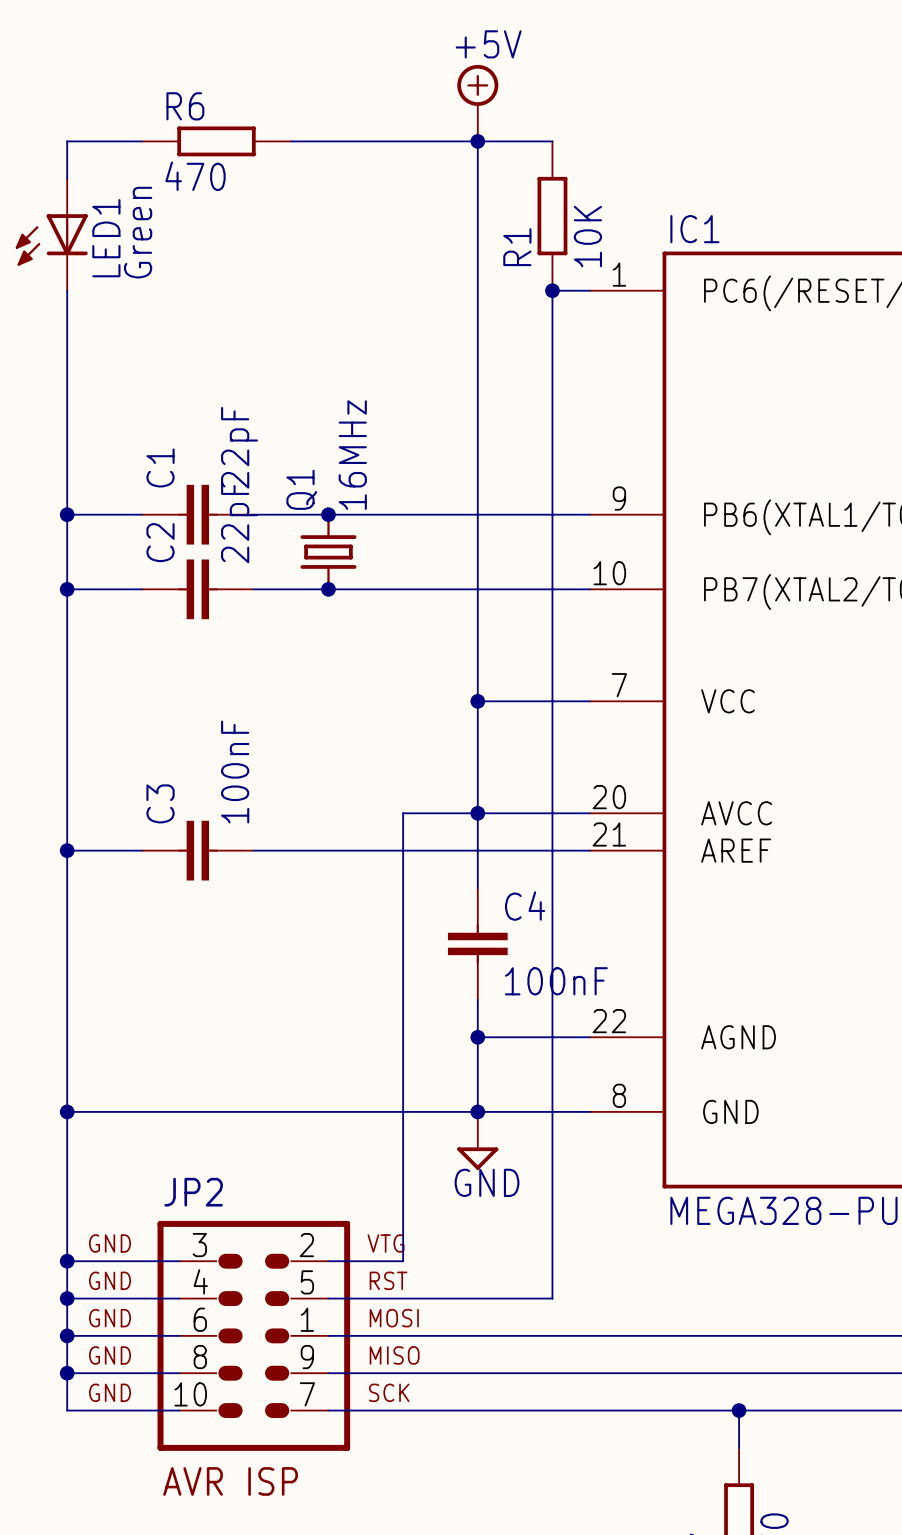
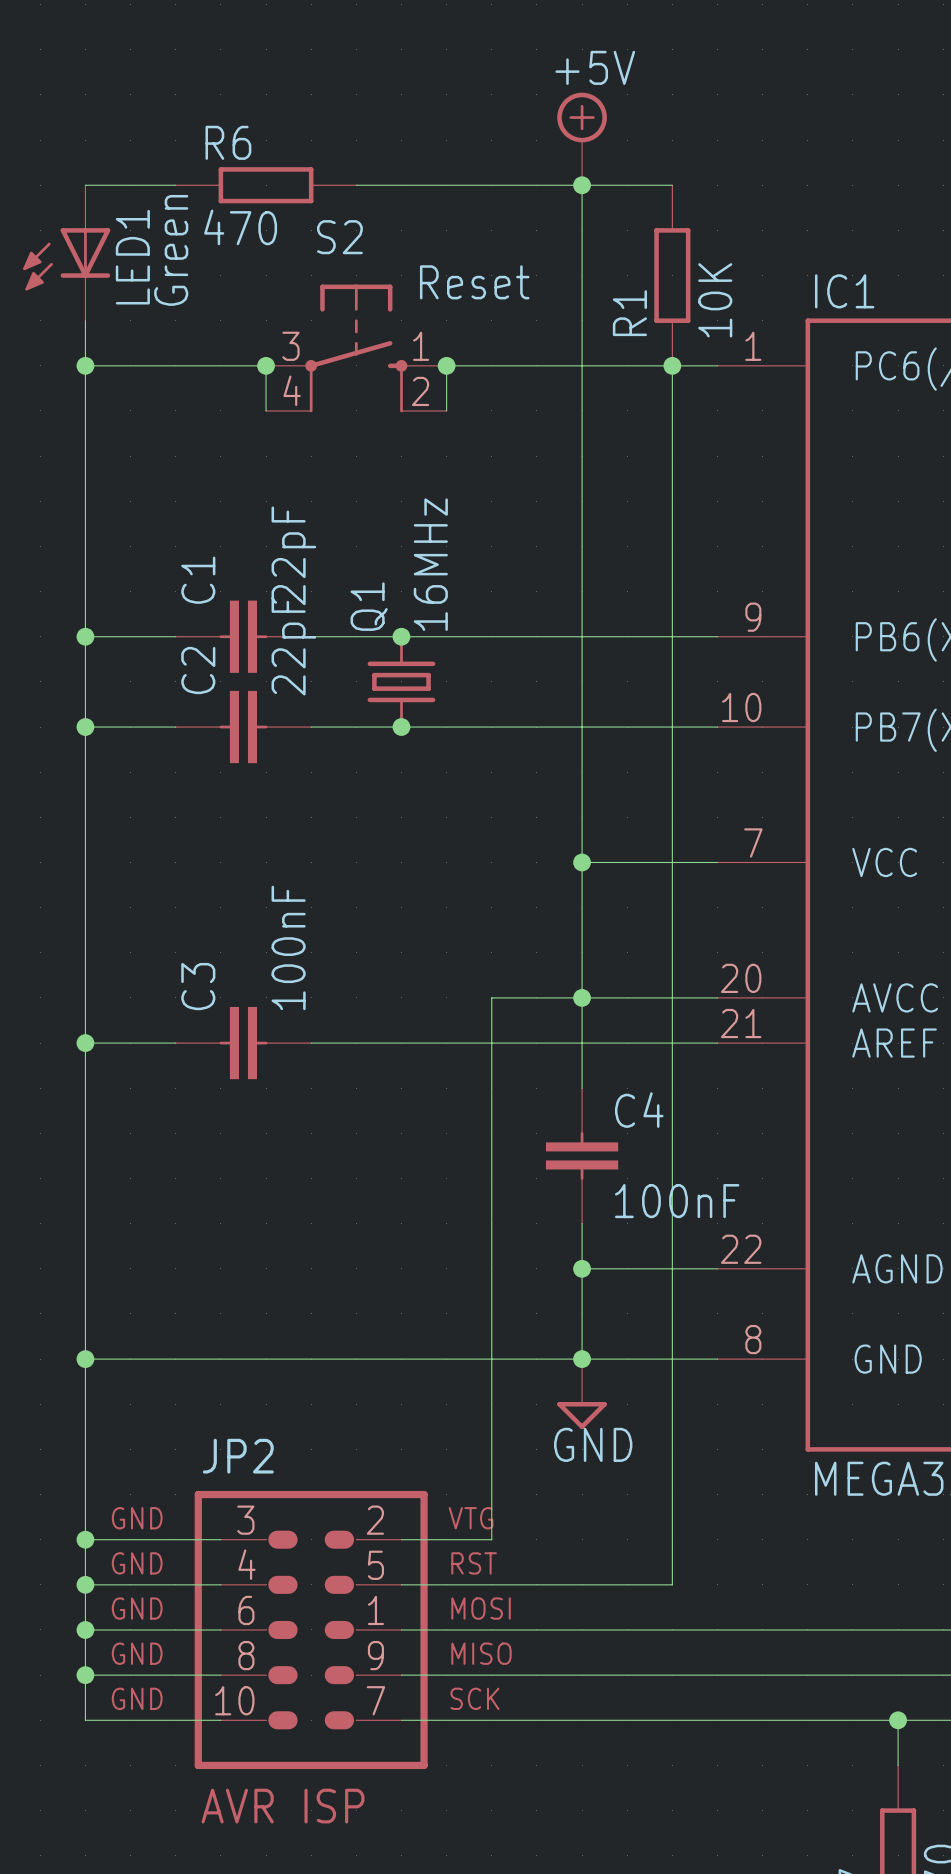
LED1 position: (51, 234) -> (66, 252)
wire: none -> (85, 320) (85, 365) (266, 365) (266, 410)
S2: none -> Reset (356, 348)
junction: none -> (85, 365)
junction: none -> (266, 365)
junction: none -> (446, 365)
wire: none -> (672, 365) (446, 365) (446, 410)

